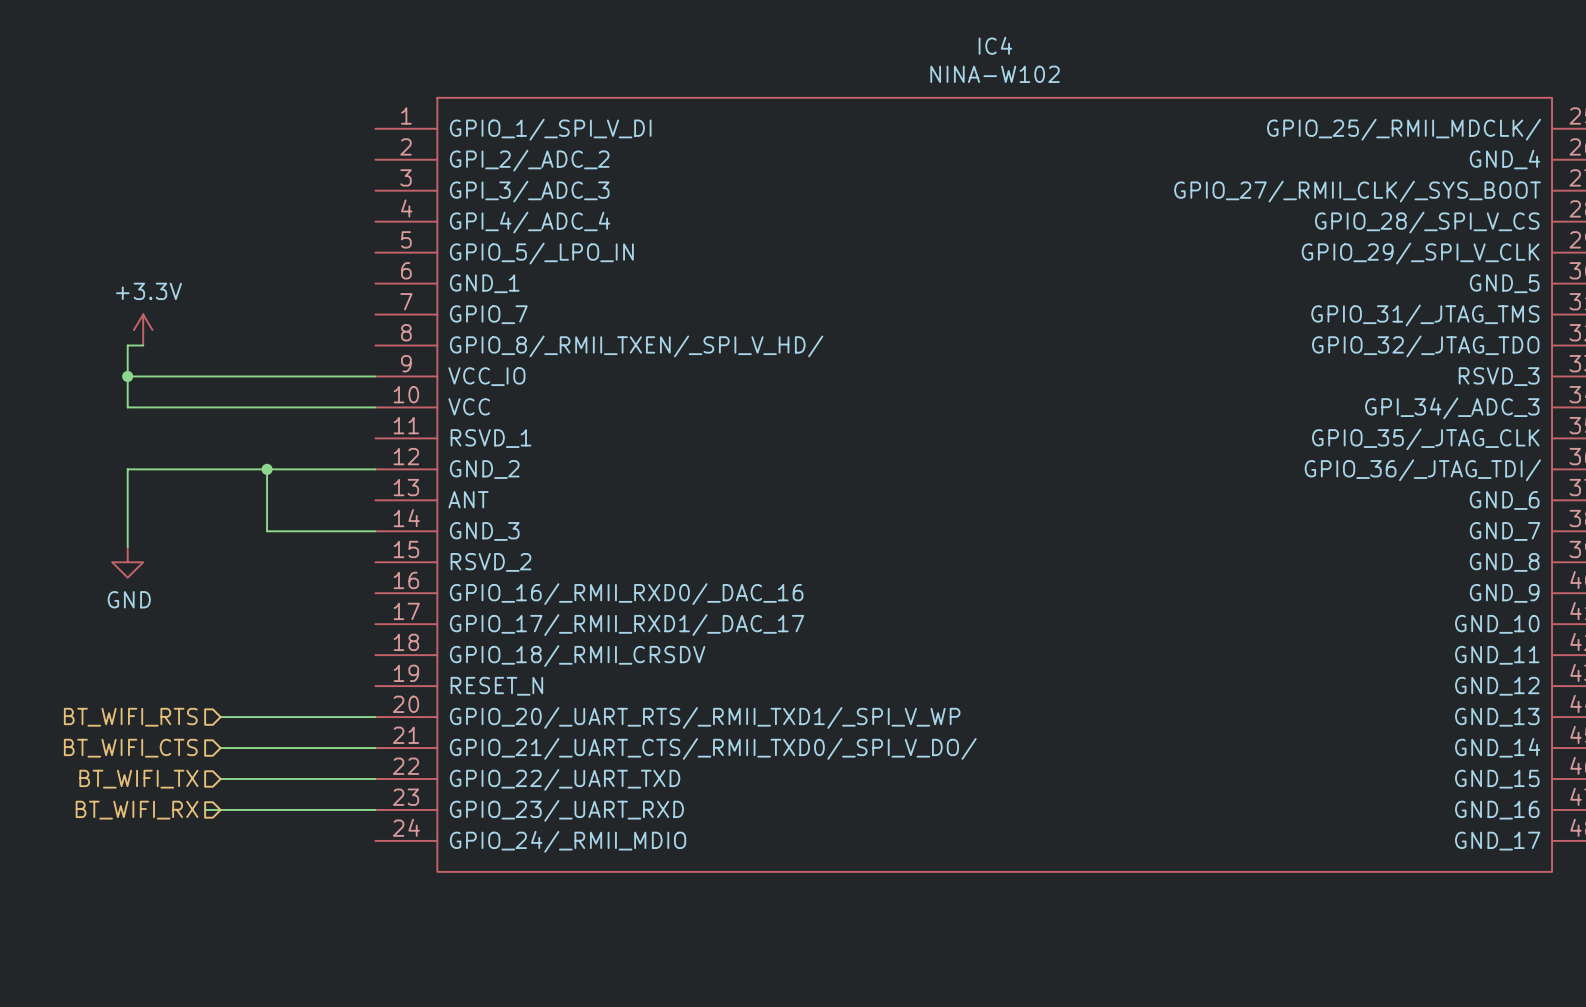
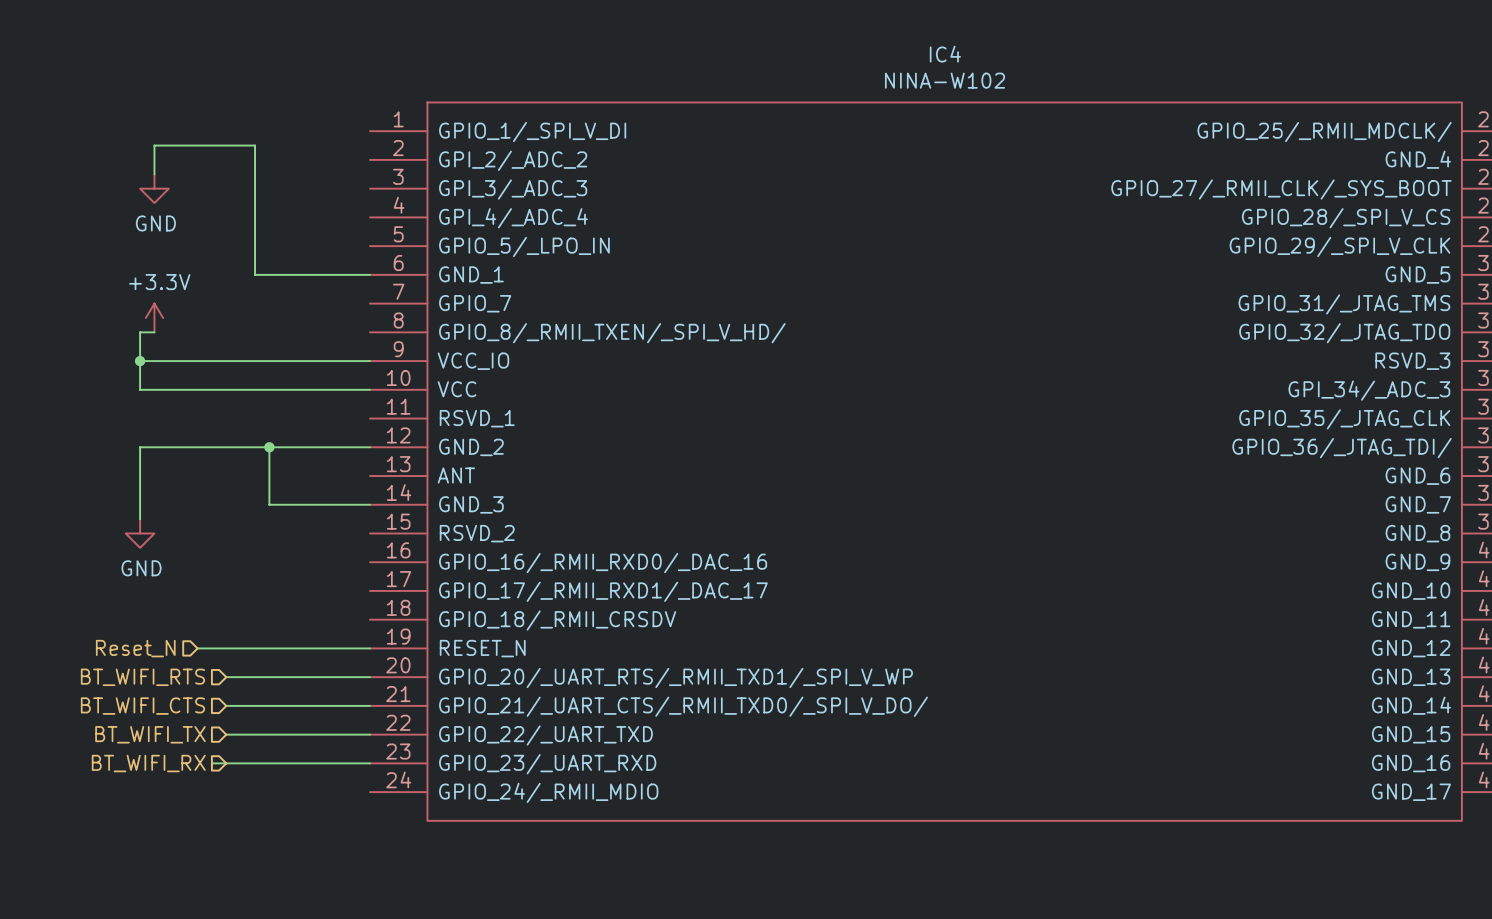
wire: none -> (154, 174) (154, 145) (255, 145) (255, 274) (369, 274)
power symbol: none -> GND (154, 188)
hierarchical label: none -> Reset_N (135, 648)
wire: none -> (197, 648) (369, 648)

